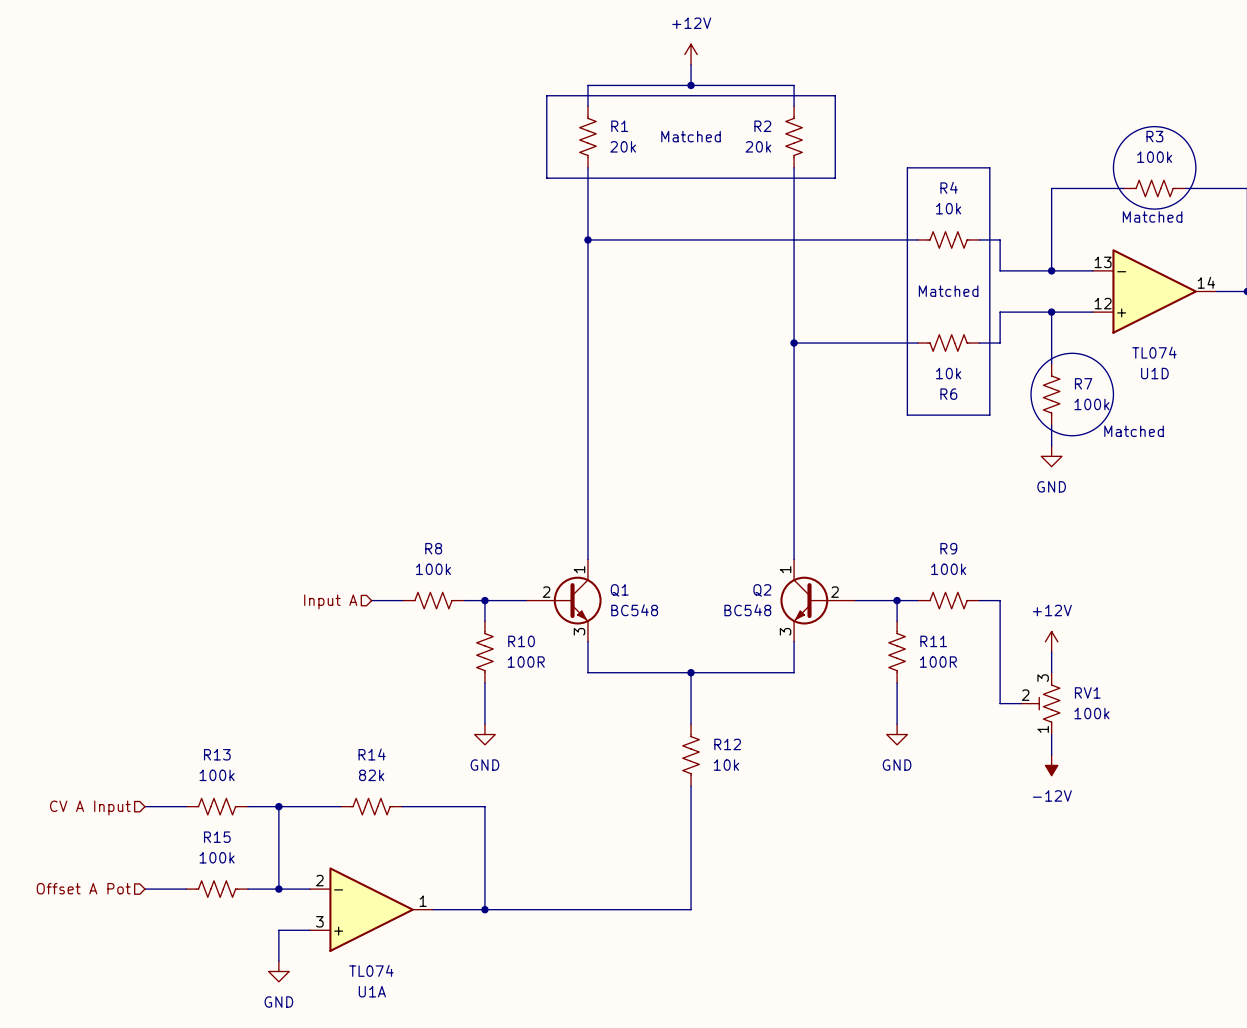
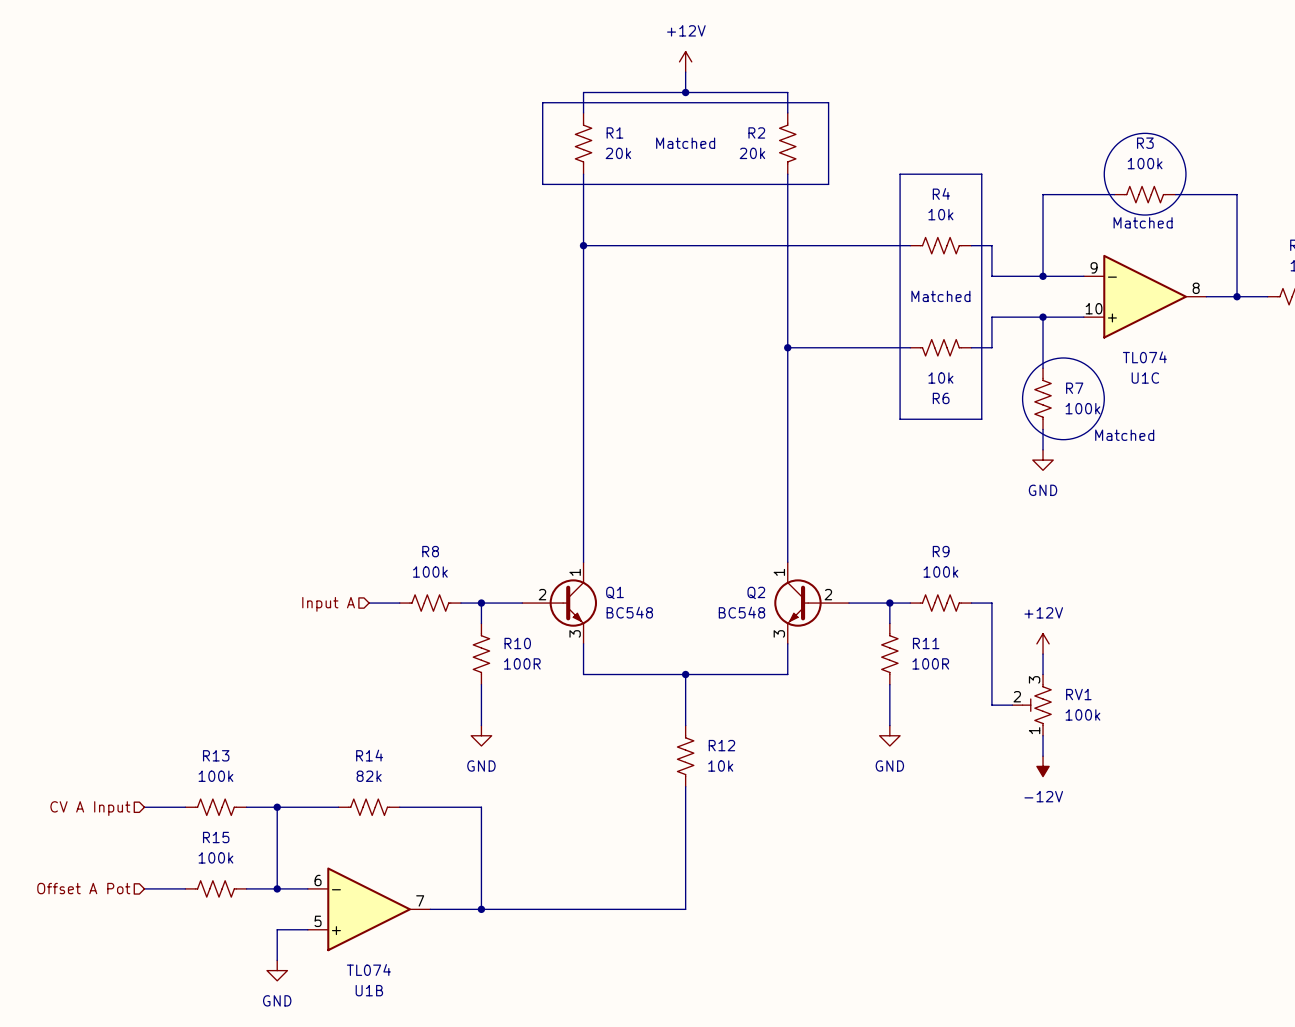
U1D pin number: 13 (1103, 262) -> 9 (1094, 267)
U1D pin number: 14 (1206, 282) -> 8 (1196, 288)
U1D pin number: 12 (1103, 303) -> 10 (1094, 308)
U1D name: U1D (1154, 373) -> U1C (1145, 378)
U1A pin number: 2 (319, 880) -> 6 (318, 880)
U1A pin number: 1 (423, 901) -> 7 (420, 900)
U1A pin number: 3 (319, 921) -> 5 (318, 921)
U1A name: U1A (372, 991) -> U1B (369, 990)

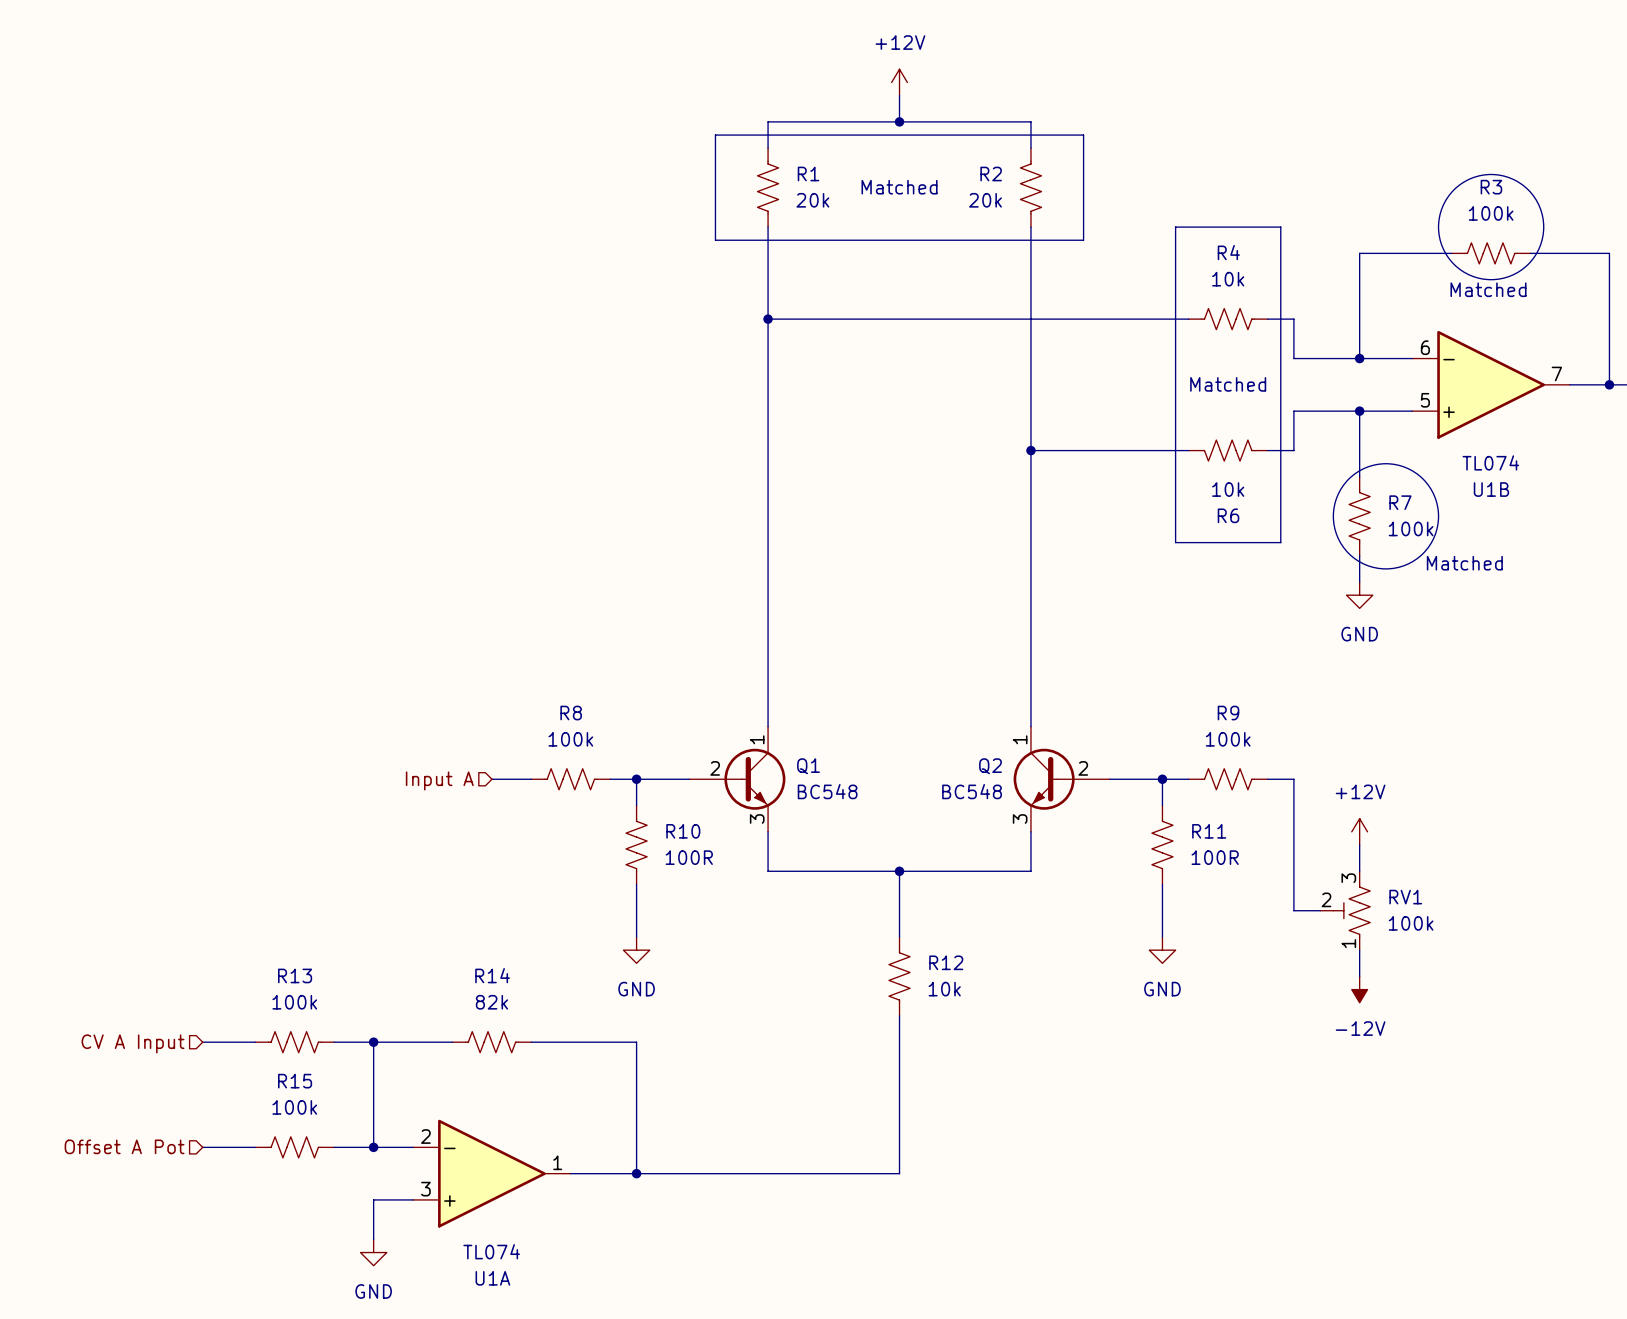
U1C: TL074 (1145, 296) -> none
U1B position: (369, 909) -> (1491, 384)
U1A: none -> TL074 (491, 1173)

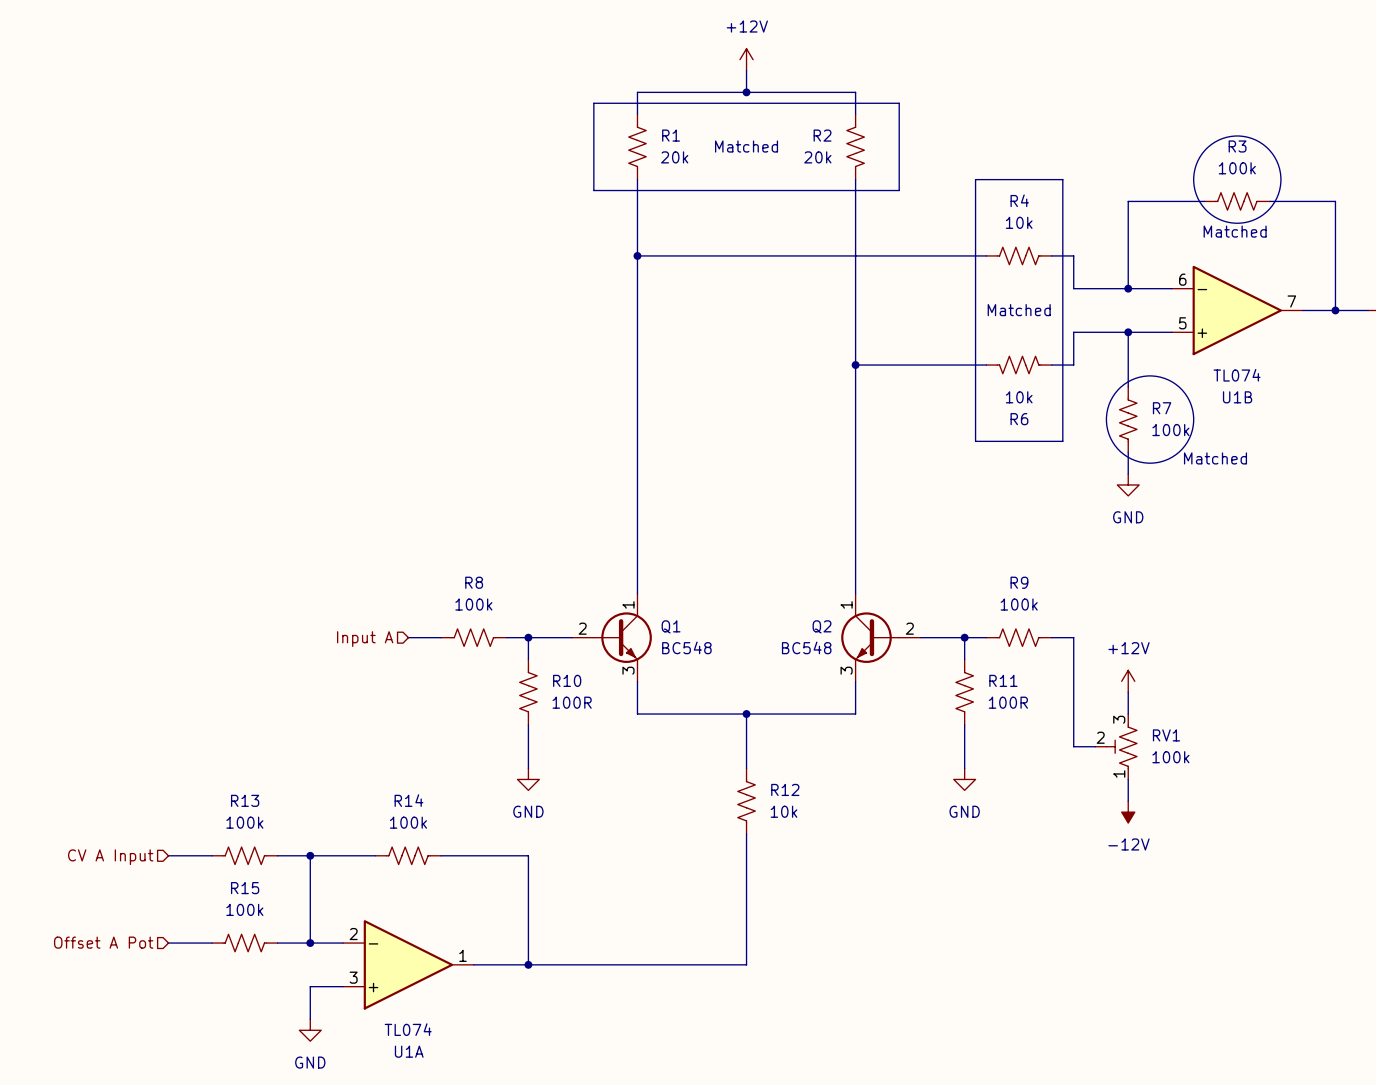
Q1 symbol: [689, 726, 786, 832] -> [572, 594, 652, 682]
Q2 symbol: [1013, 726, 1110, 832] -> [841, 594, 922, 682]
R14 value: 82k (491, 1002) -> 100k (408, 822)

